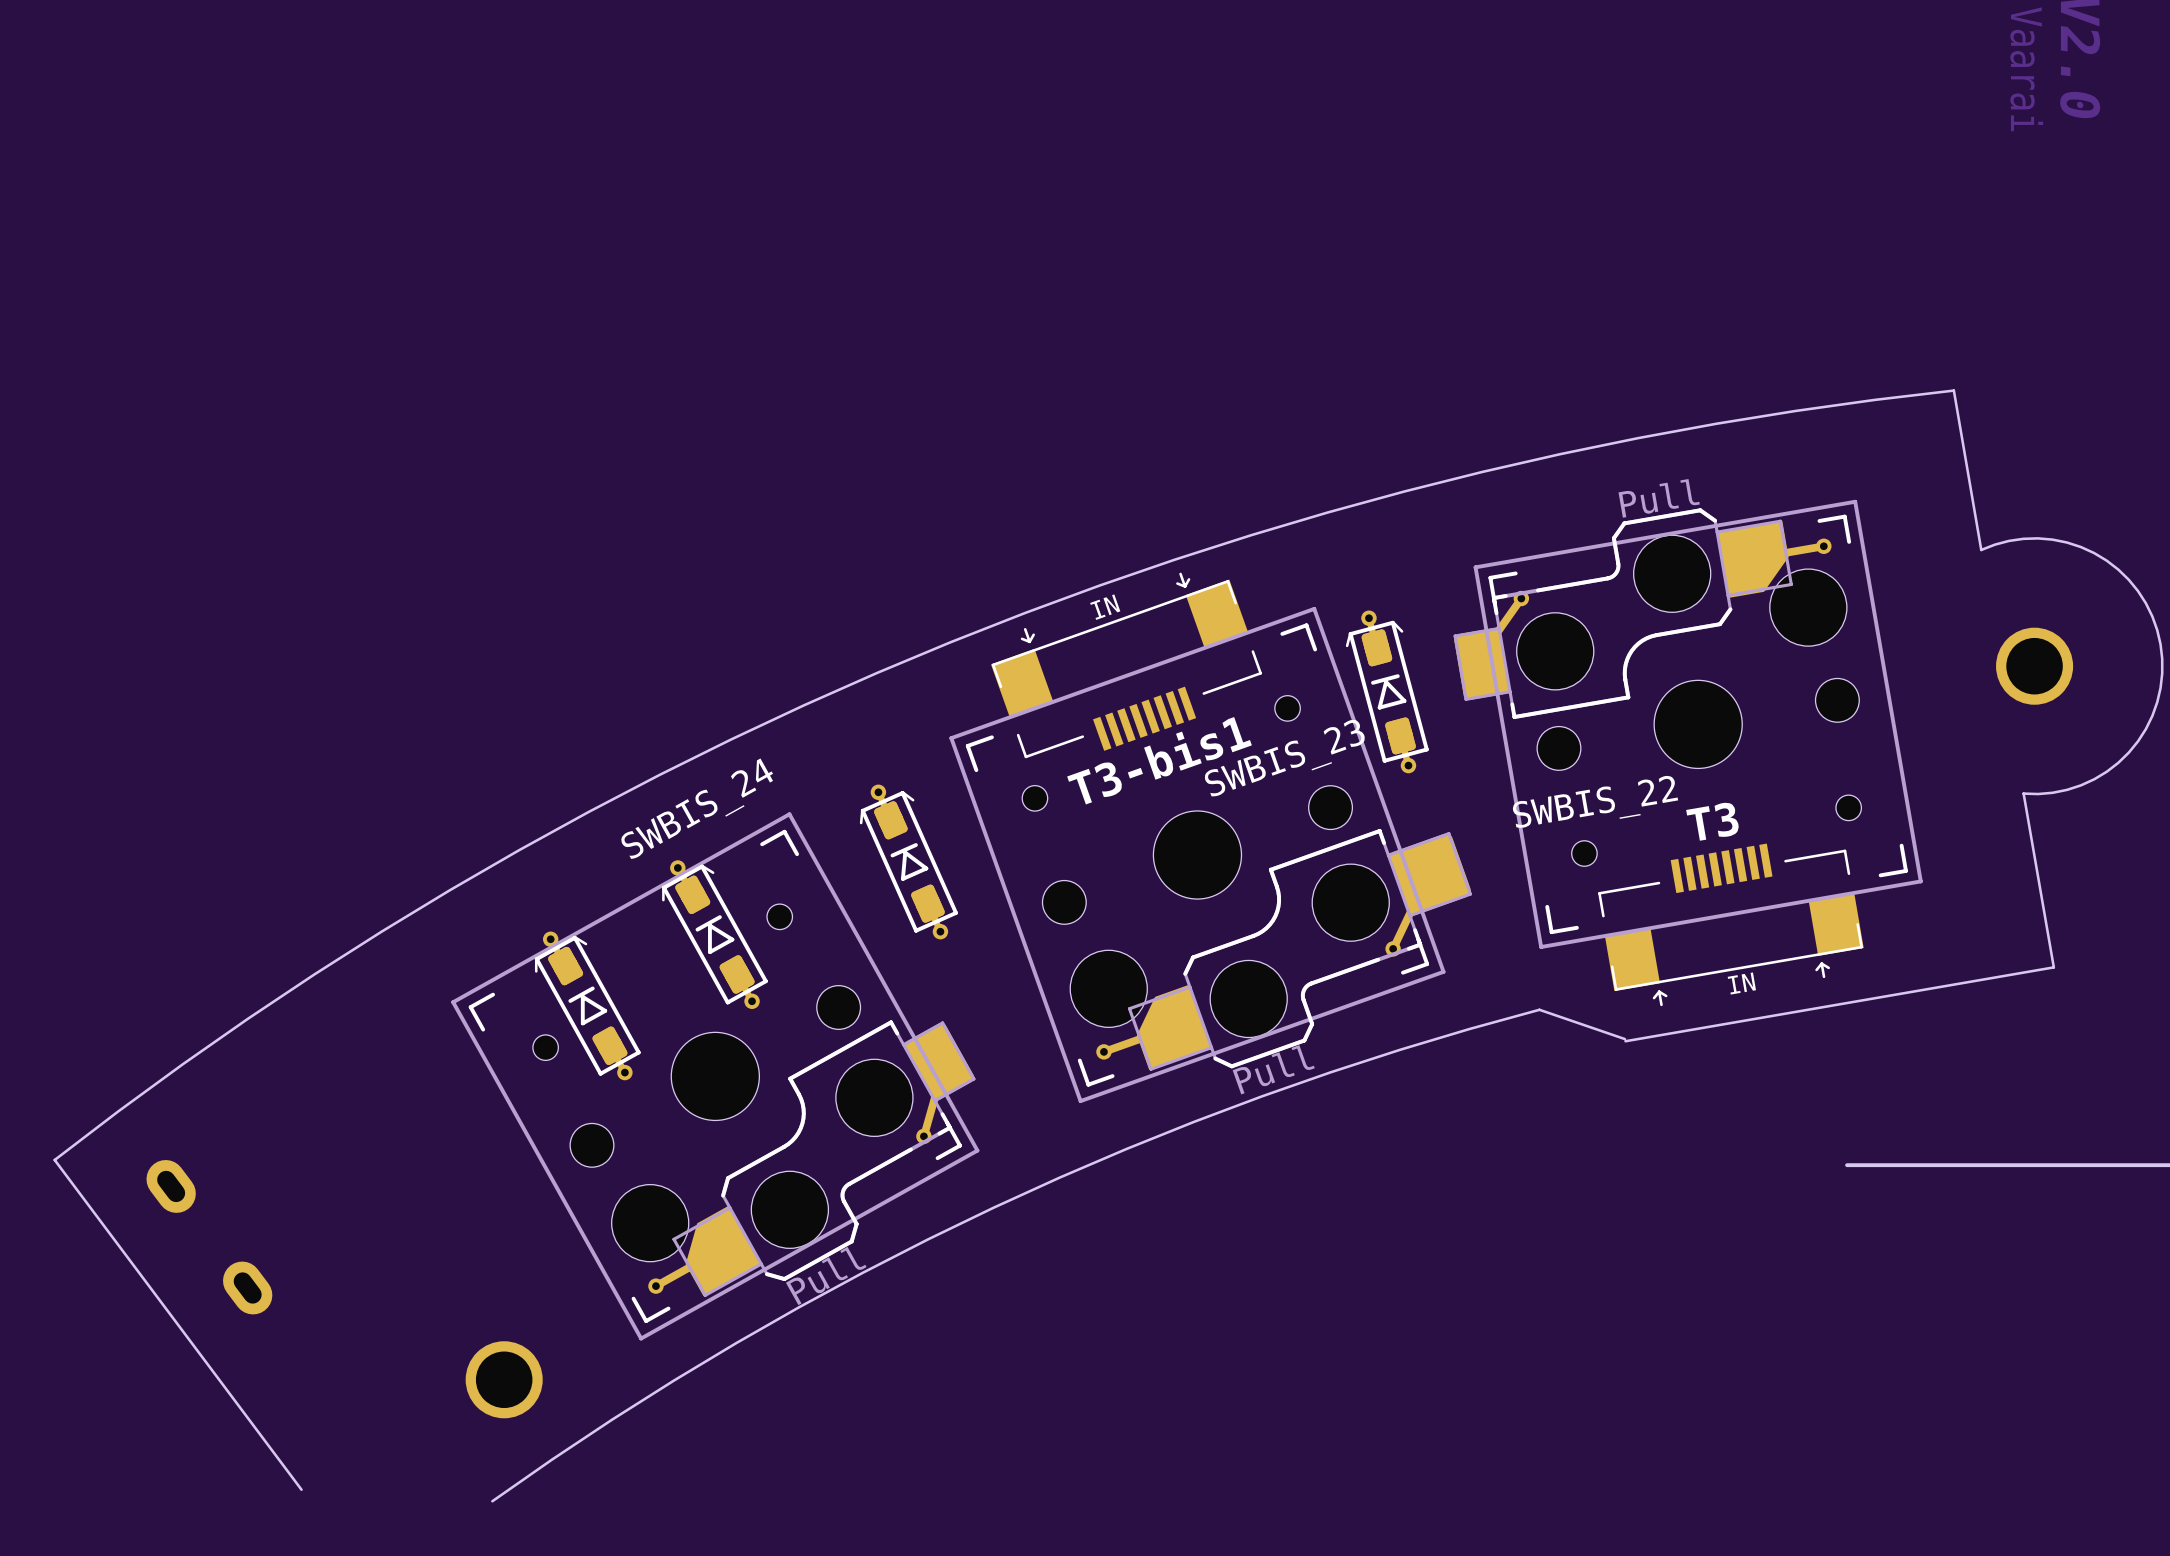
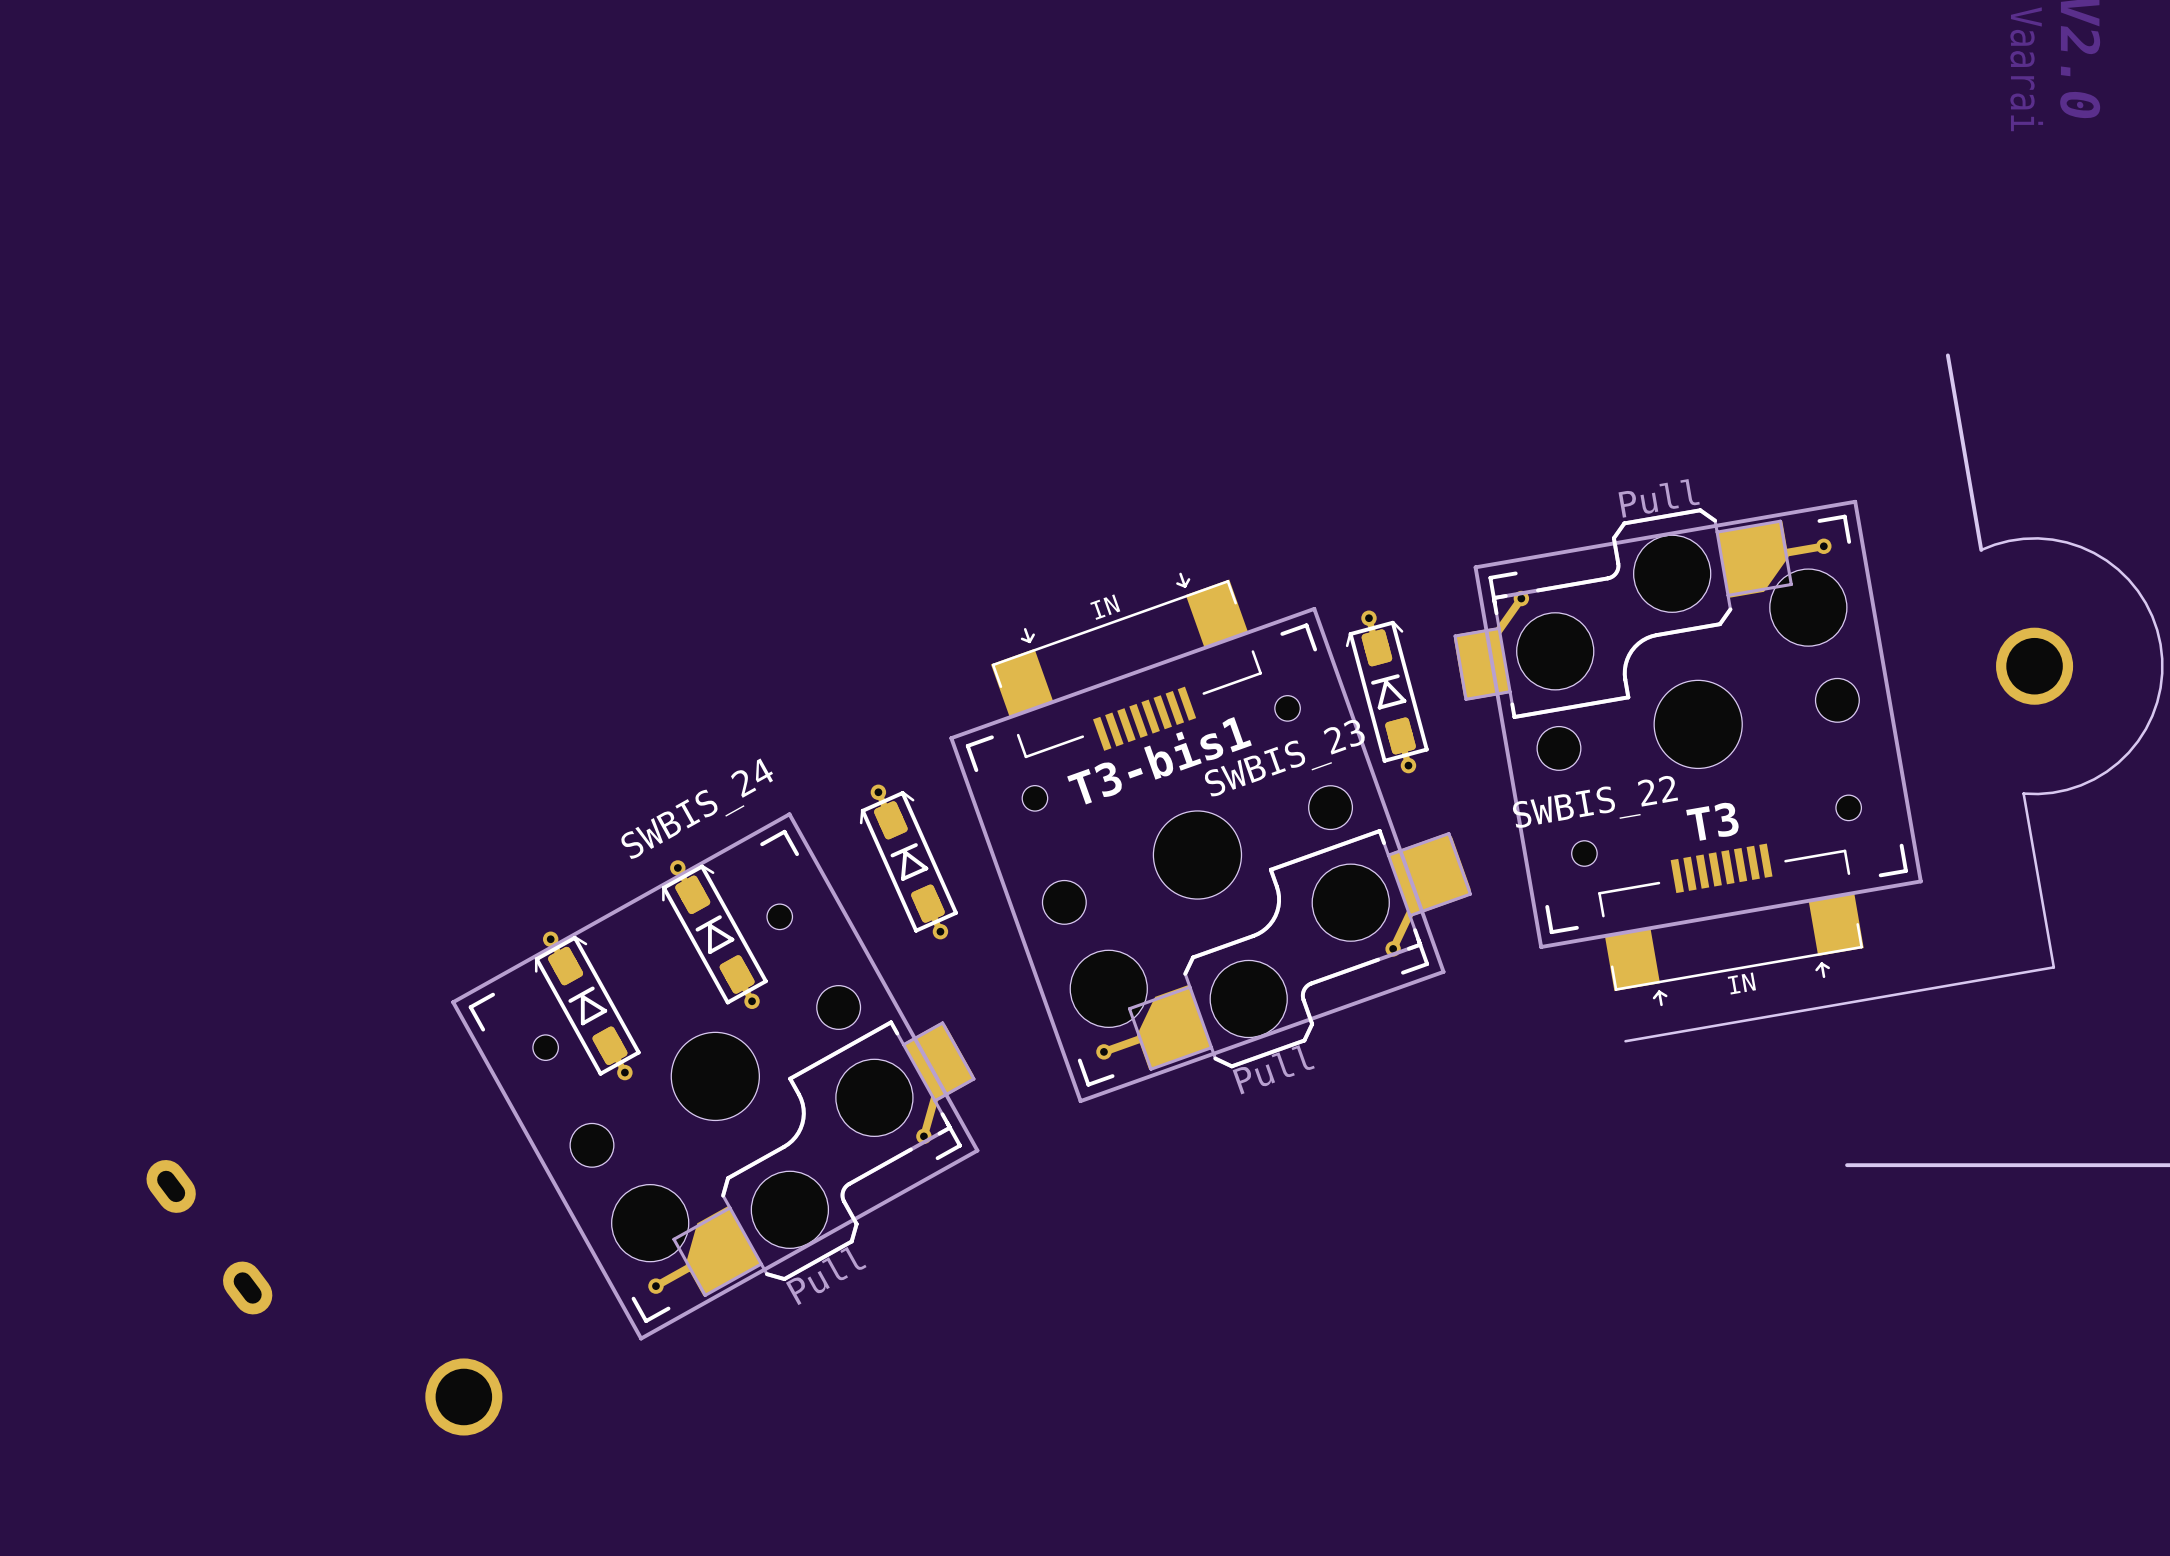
board edge: (1981, 549) (1953, 390) (1795, 410) (1638, 438) (1482, 471) (1327, 512) (1175, 559) (1099, 585) (950, 642) (803, 705) (659, 774) (519, 850) (450, 890) (314, 974) (182, 1064) (54, 1159) (301, 1489) -> (1981, 549) (1947, 355)
board edge: (1624, 1039) (1539, 1009) (1469, 1029) (1330, 1072) (1261, 1096) (1126, 1149) (1059, 1177) (928, 1239) (799, 1307) (673, 1380) (612, 1419) (492, 1501) -> none
part position: (504, 1379) -> (463, 1396)

